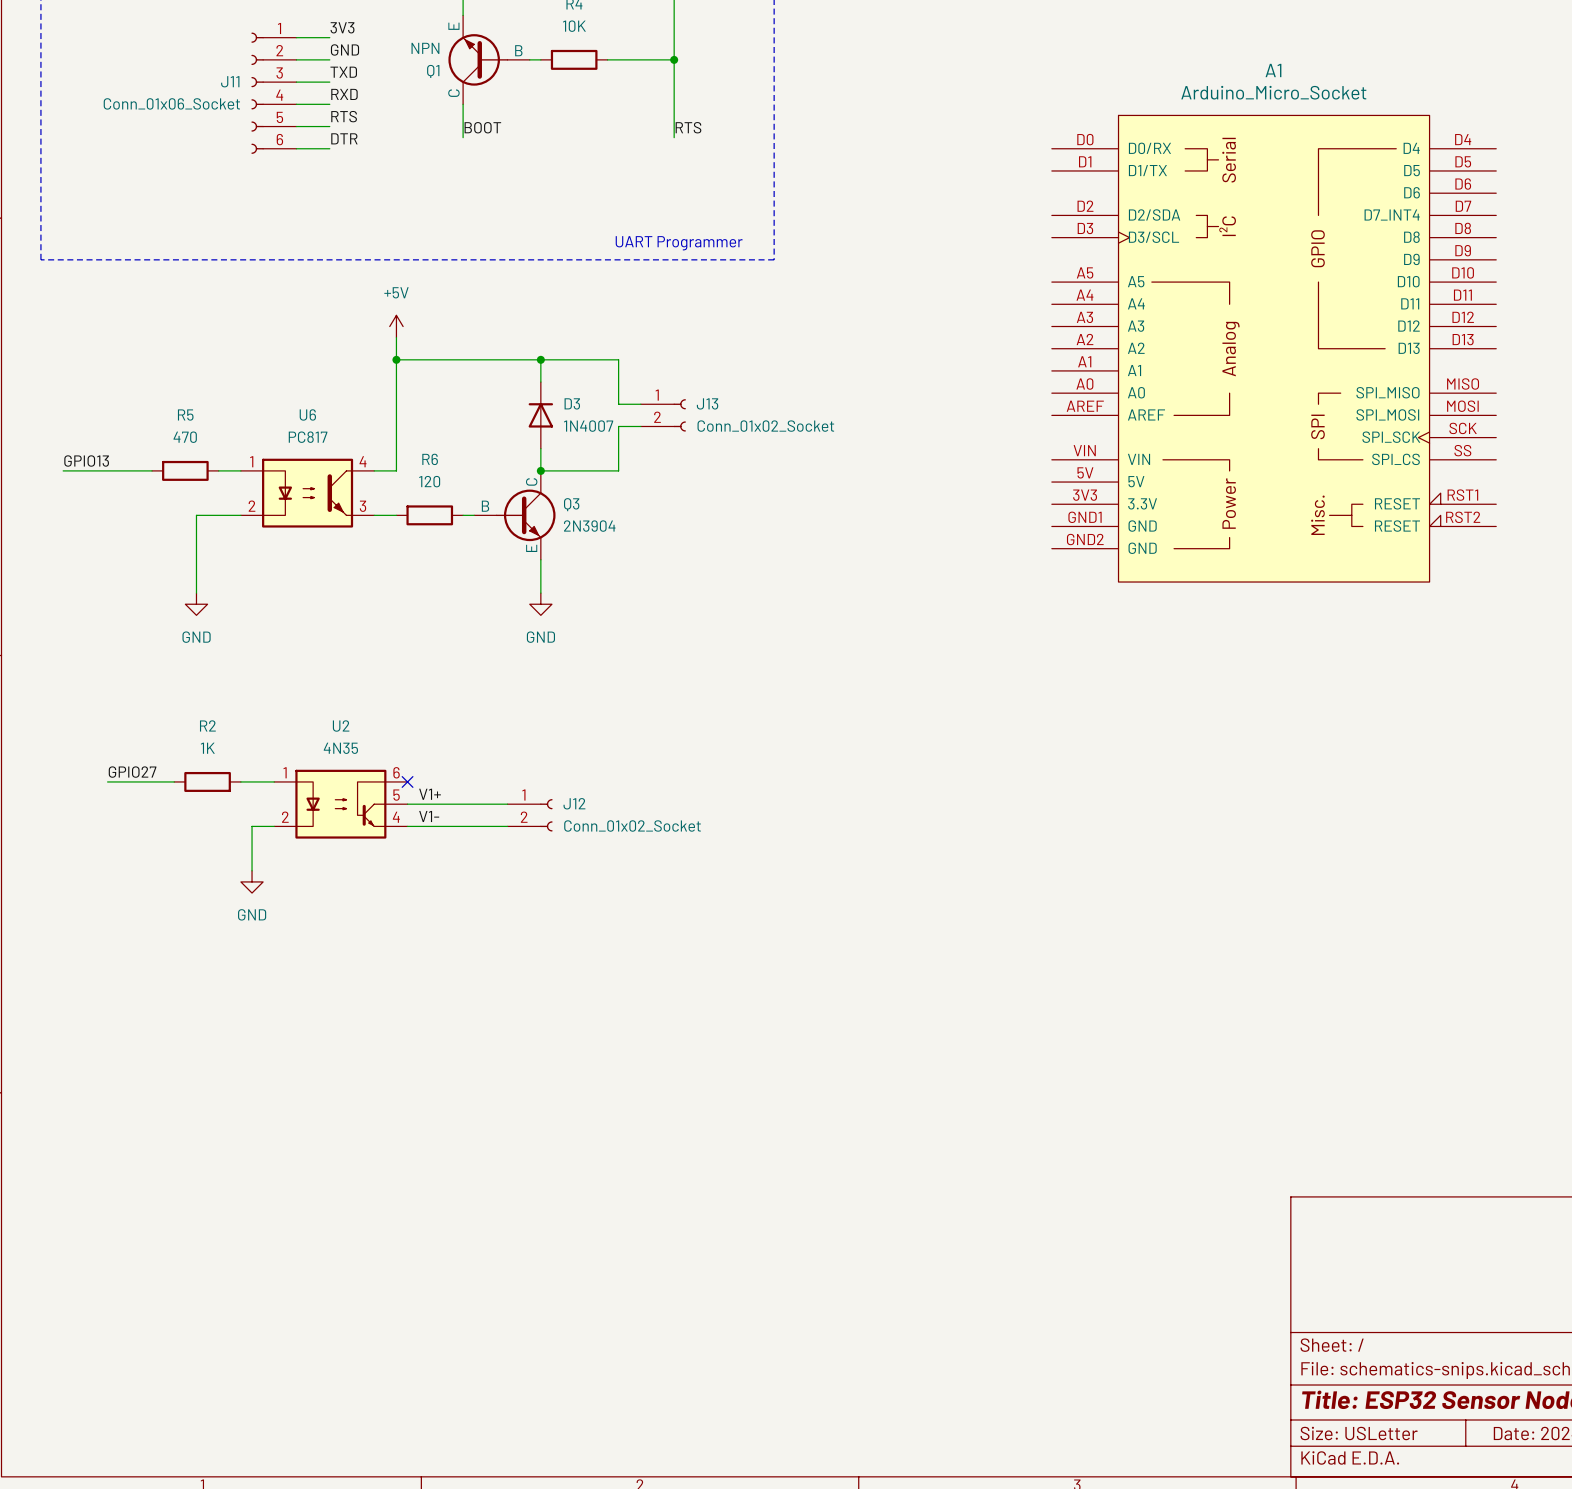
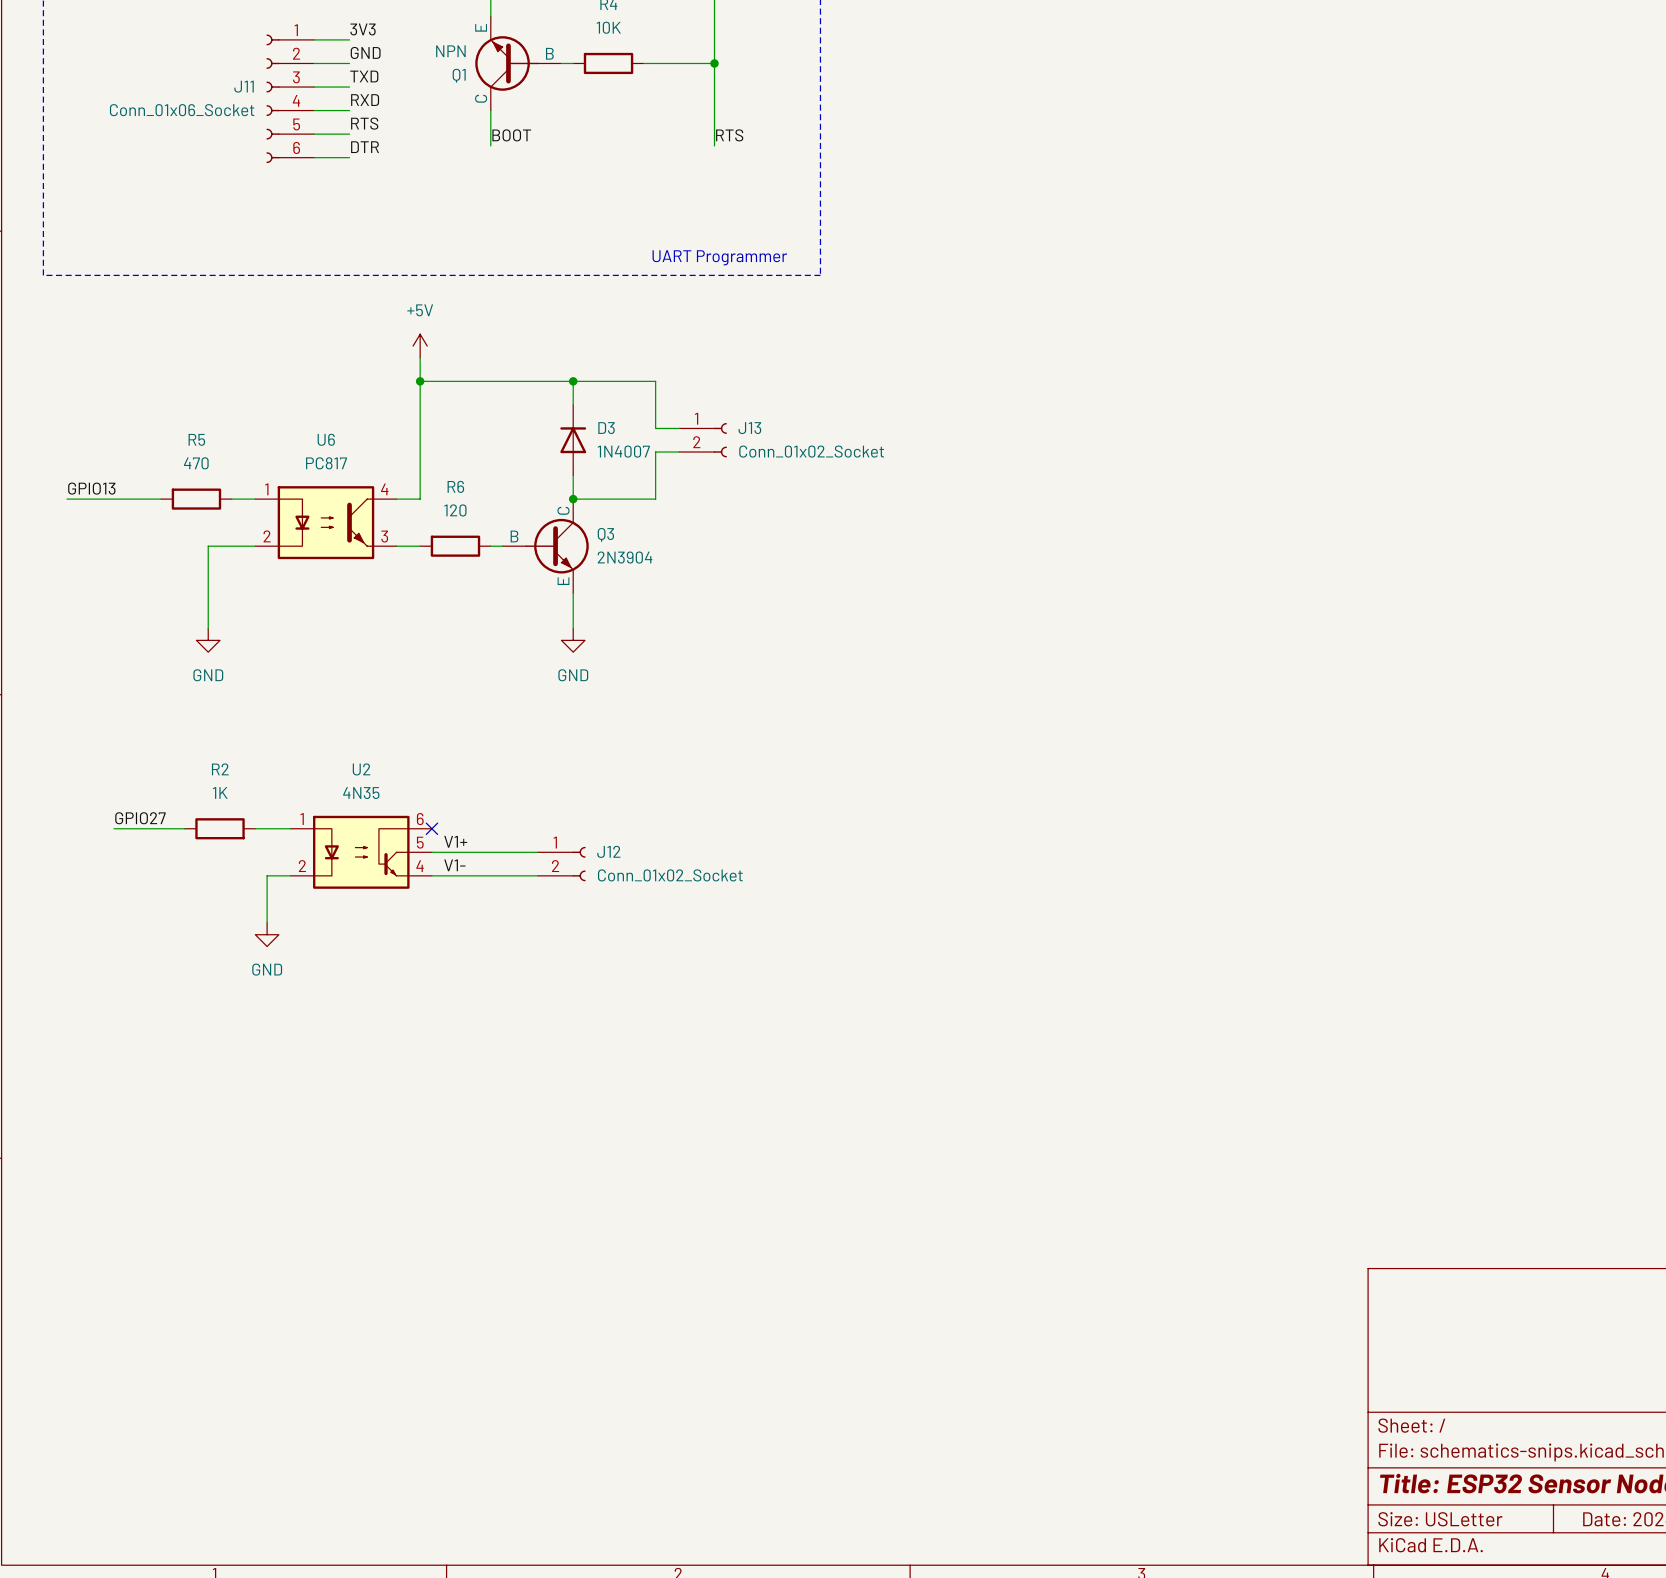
A1: Arduino_Micro_Socket (1274, 348) -> none

